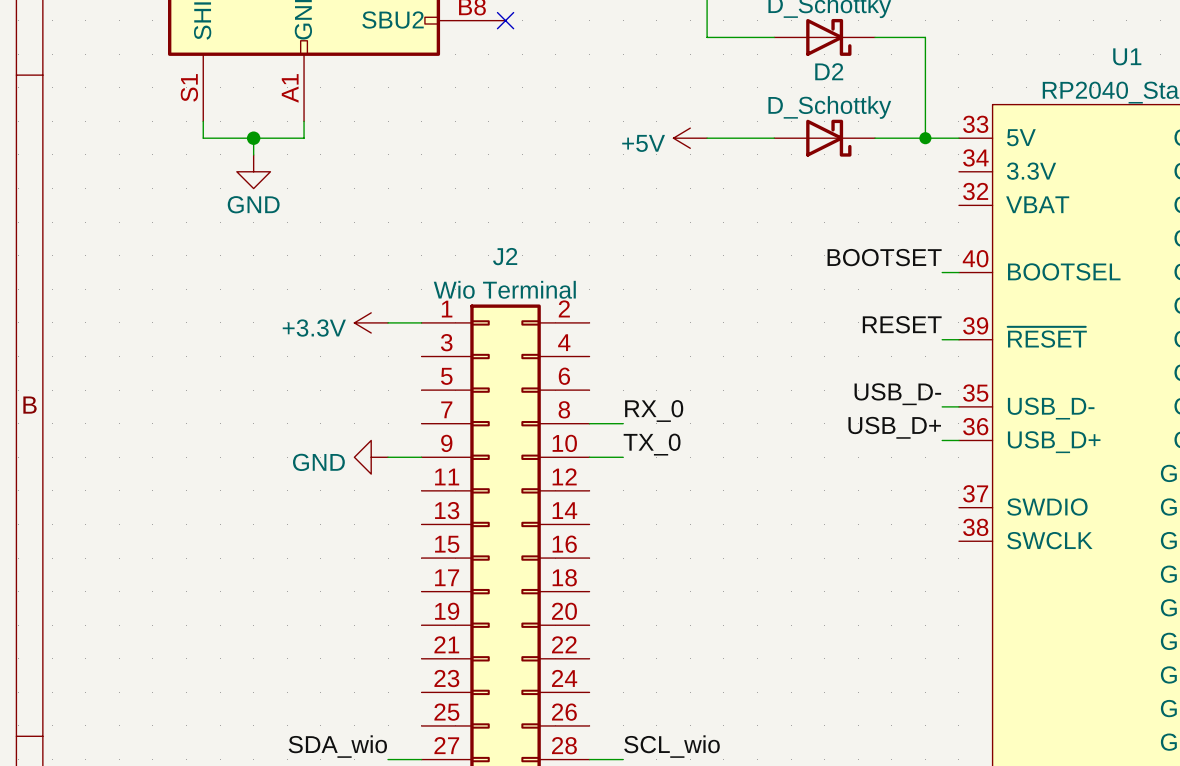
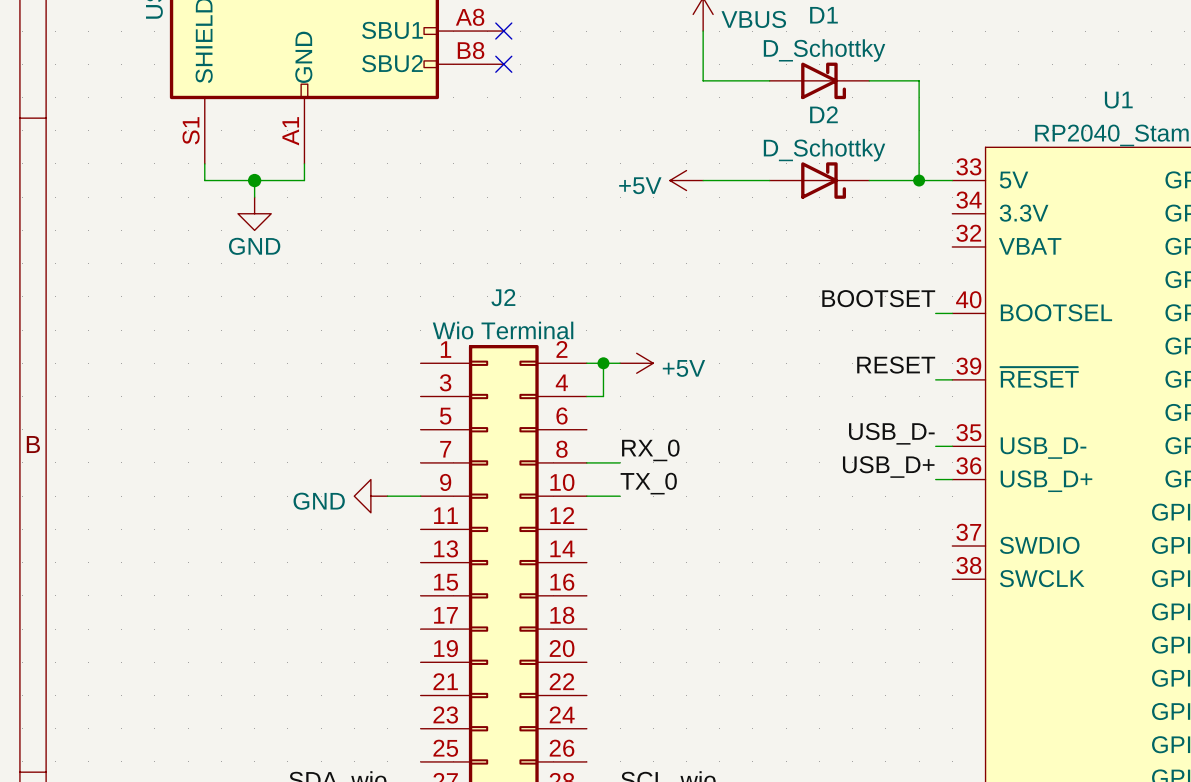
power symbol: +3.3V (371, 322) -> none
wire: (388, 322) (421, 322) -> (586, 363) (620, 363)
wire: none -> (603, 363) (603, 396) (586, 396)
junction: none -> (603, 363)
power symbol: none -> +5V (636, 363)

